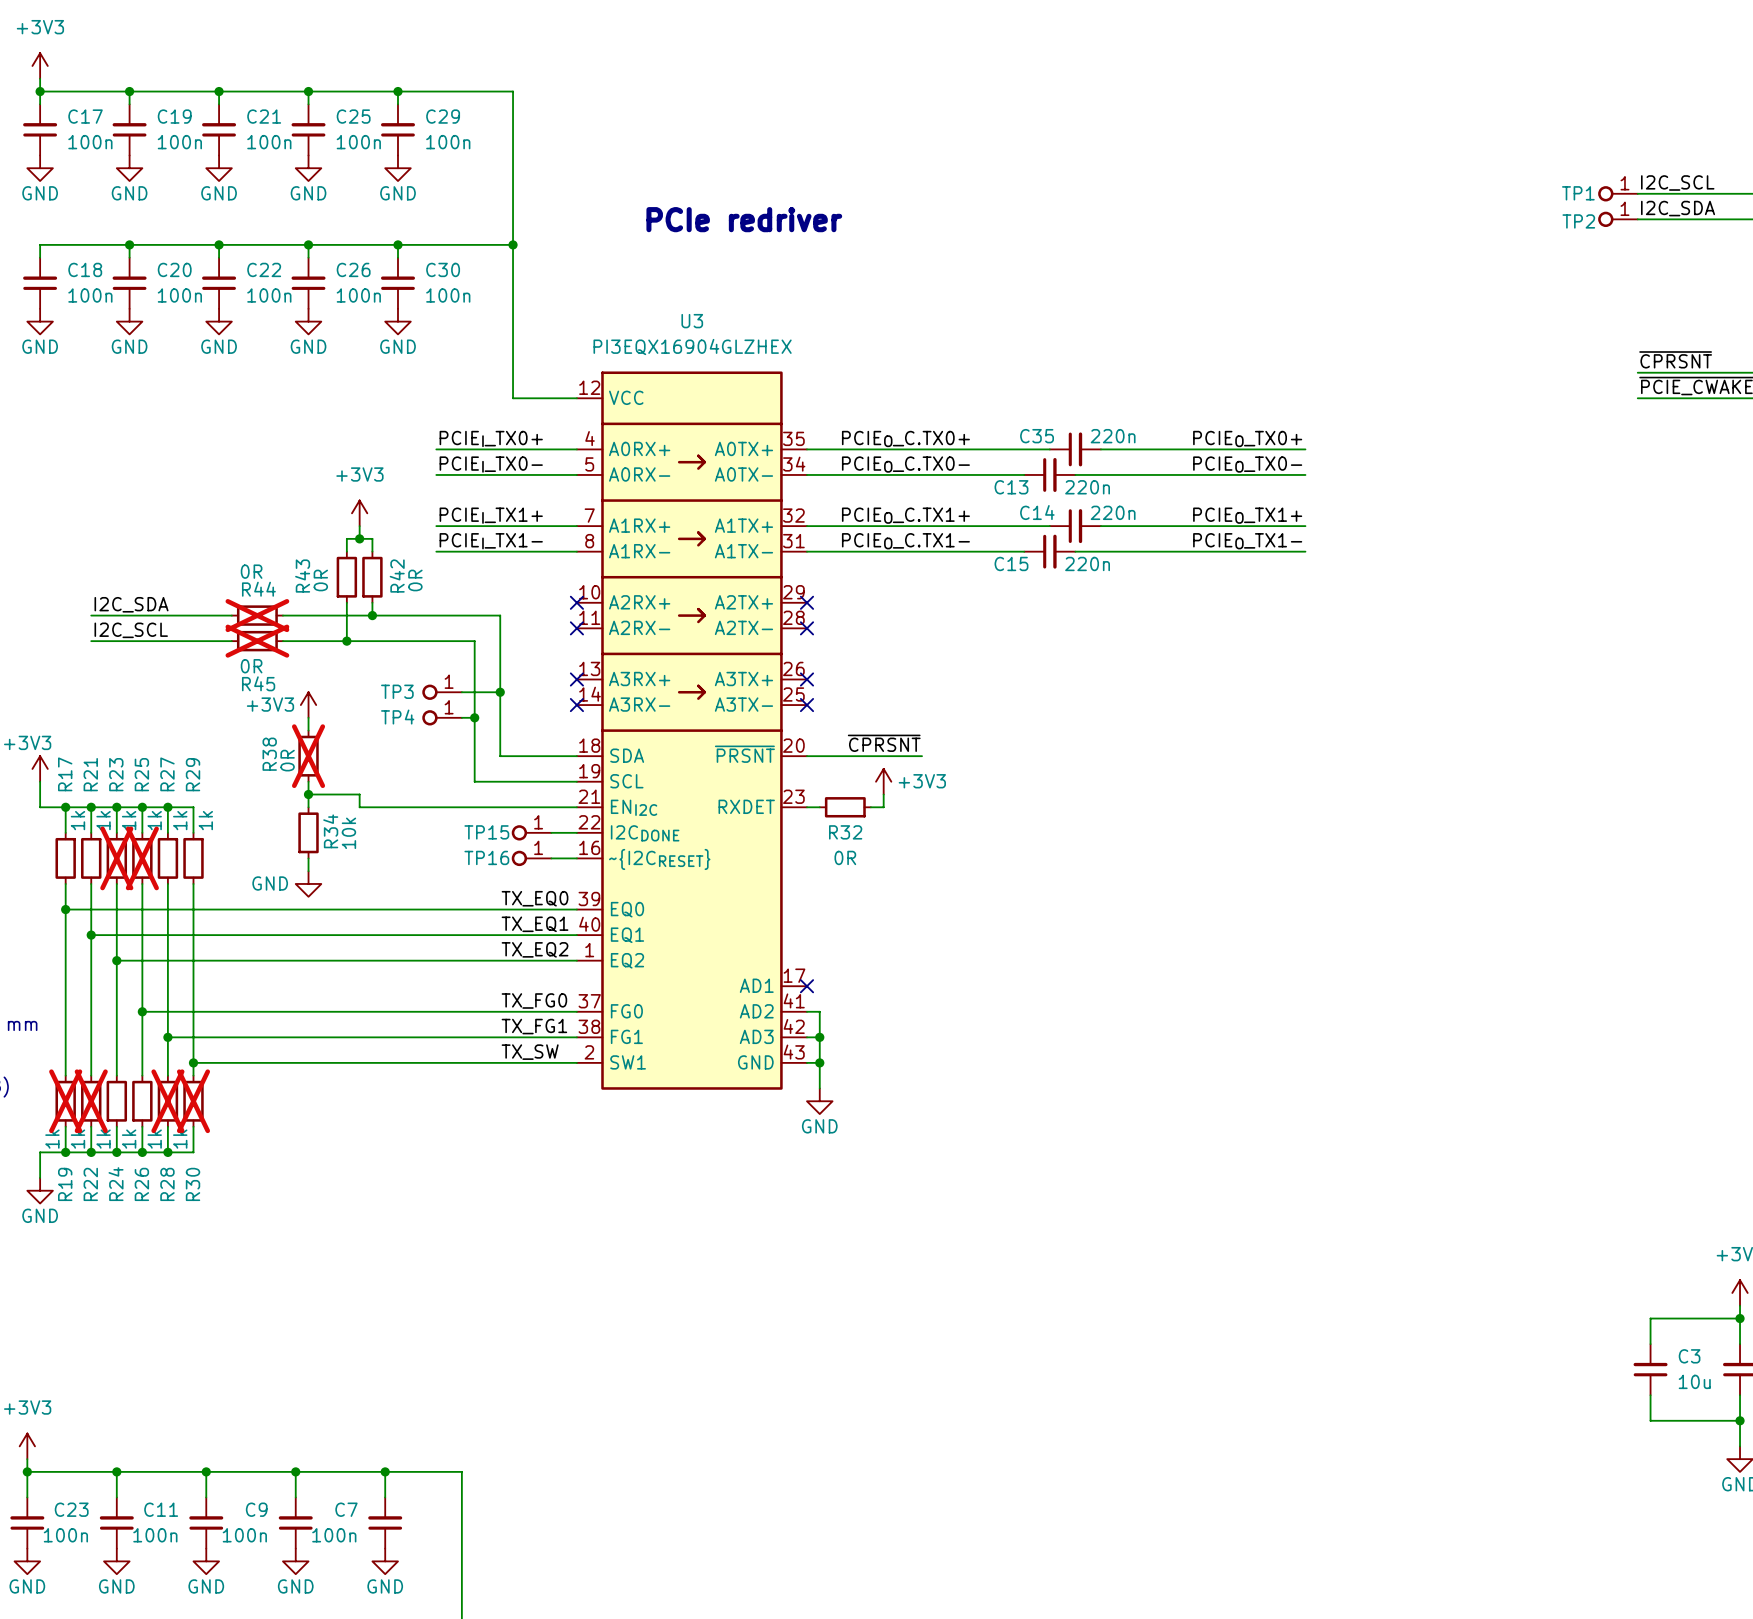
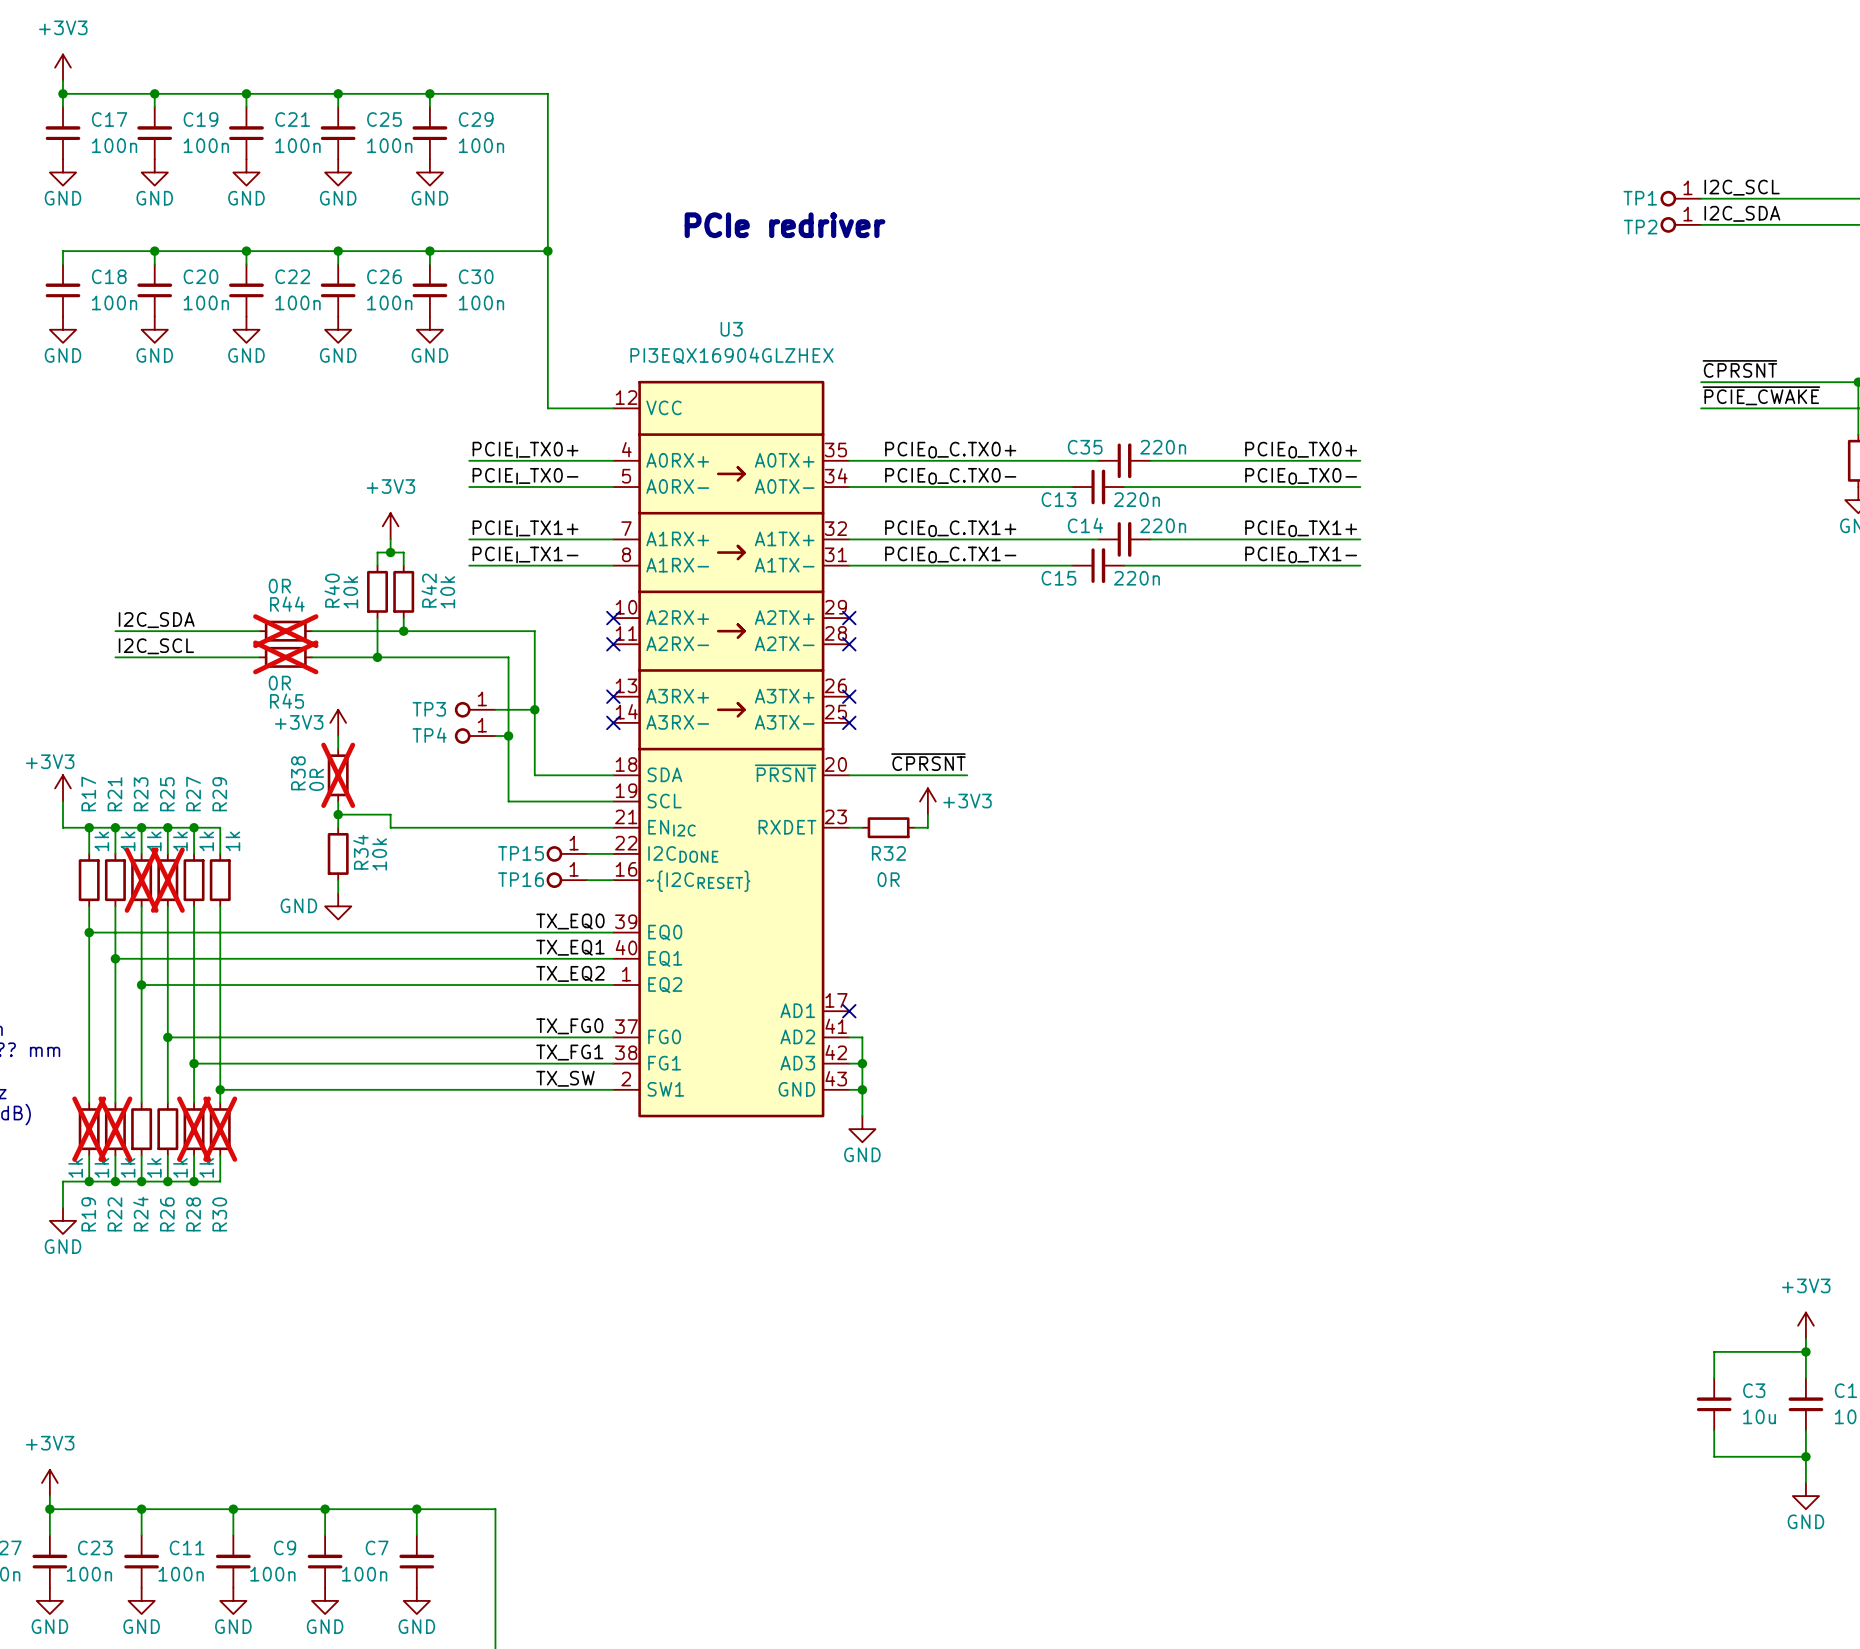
R43 name: R43 (302, 576) -> R40 (332, 590)
R43 text: 0R (320, 580) -> 10k (350, 592)
R42 text: 0R (415, 580) -> 10k (447, 592)

